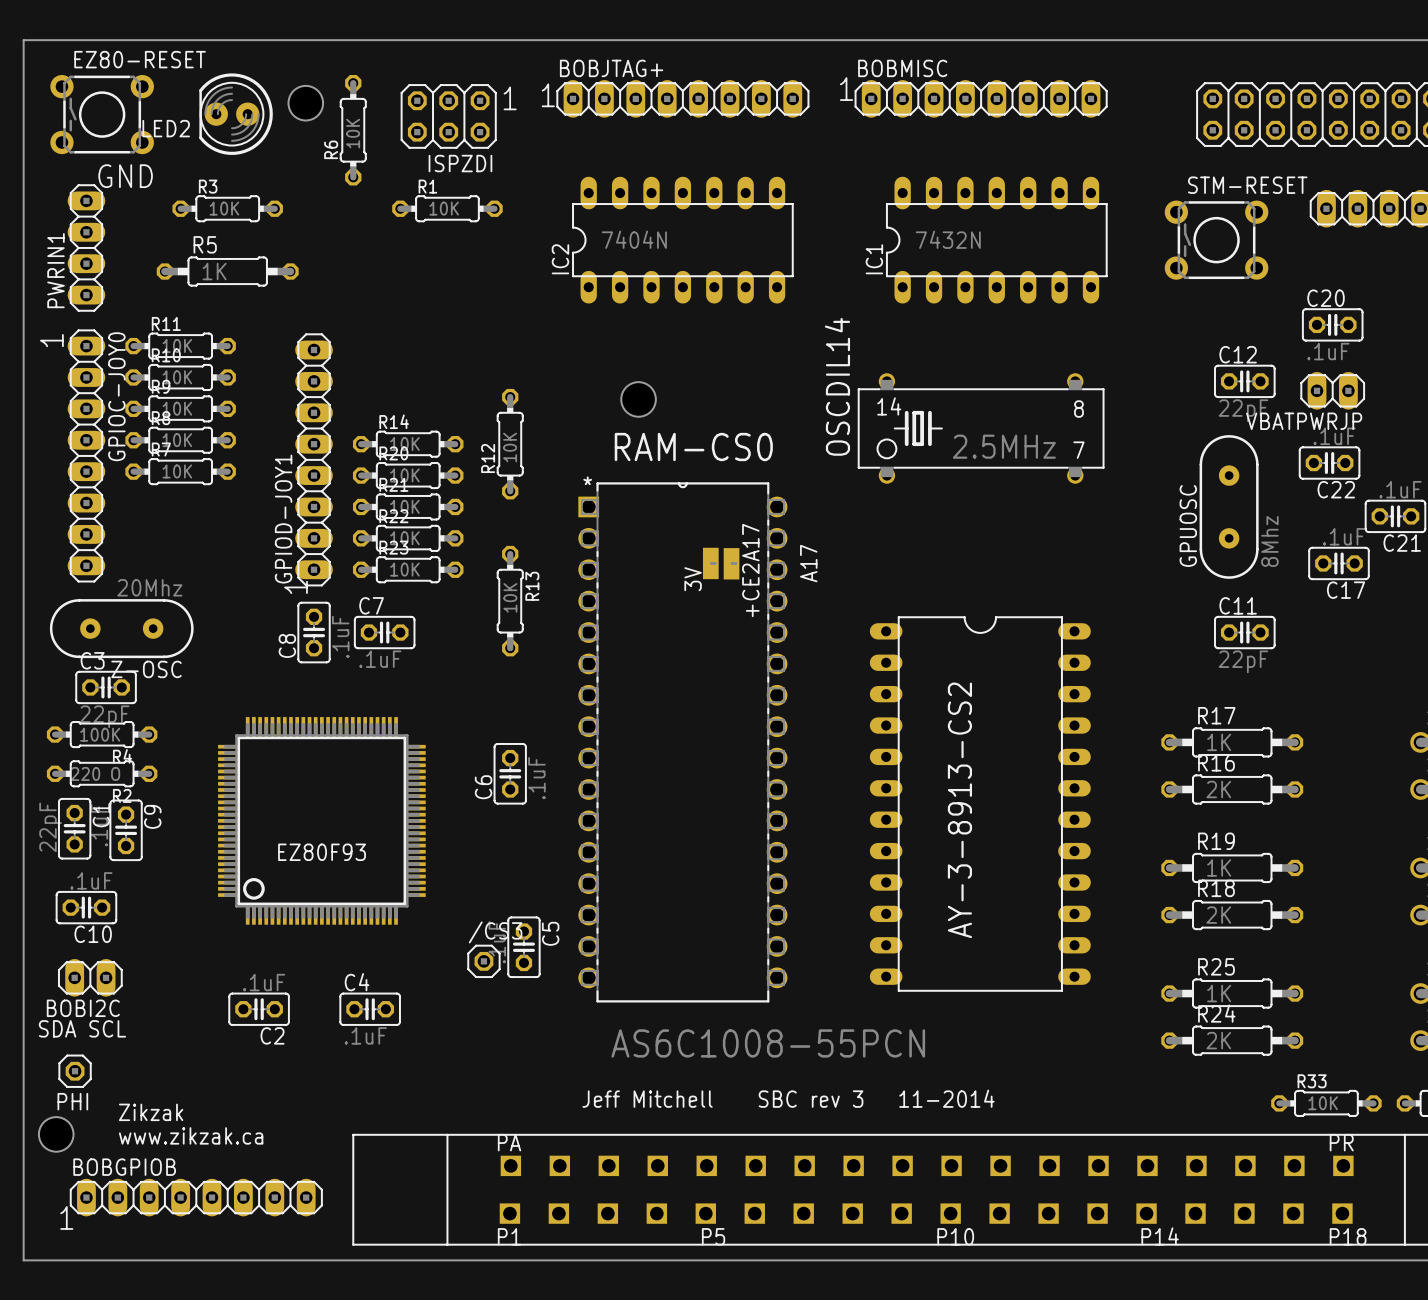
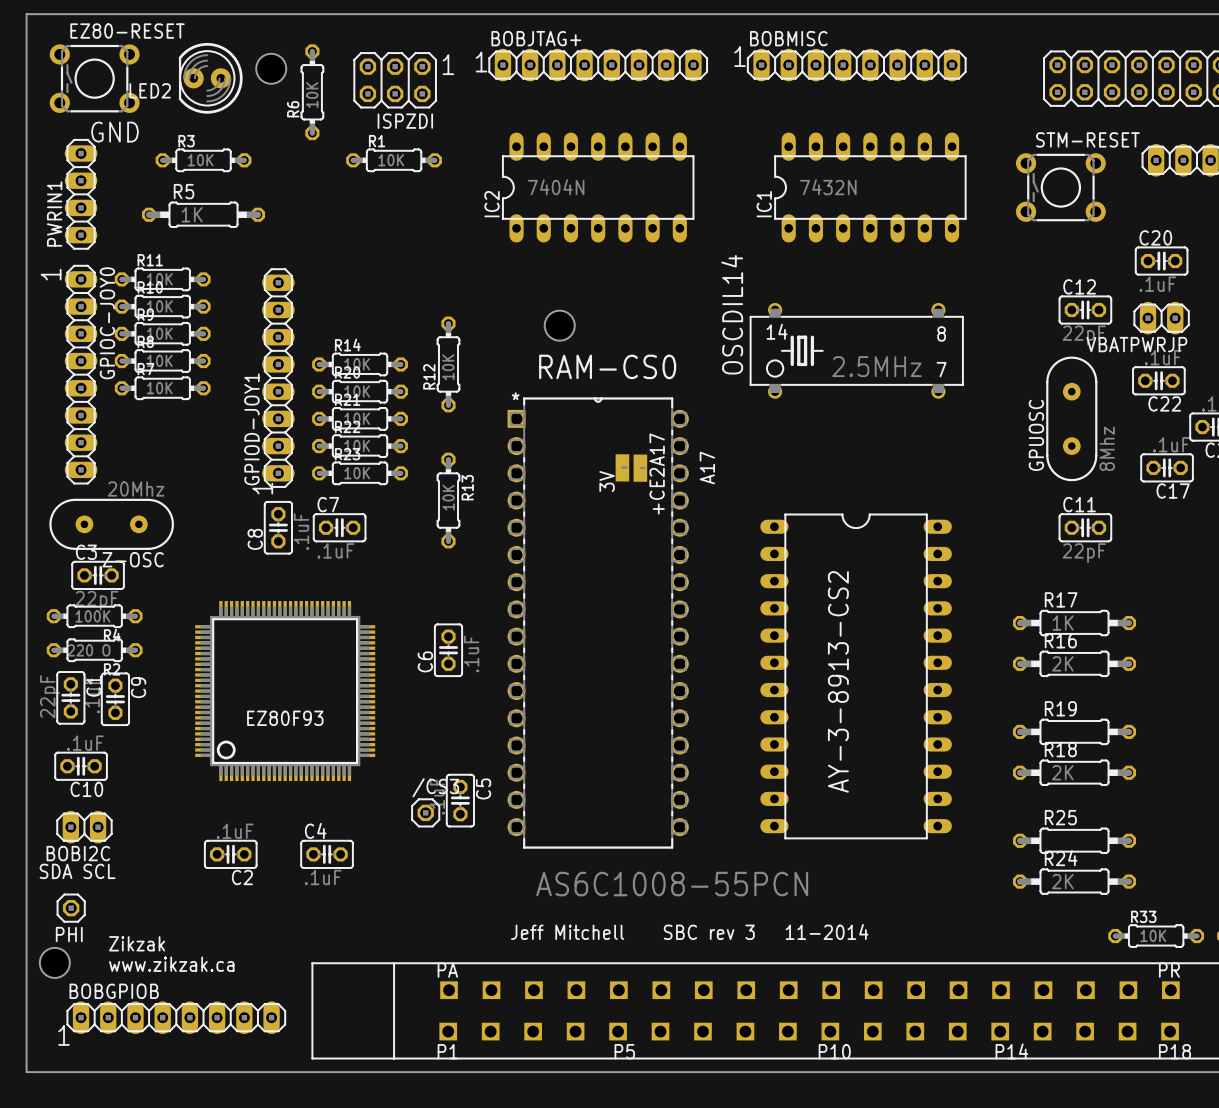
R19 value: 1K (1219, 867) -> none
R25 value: 1K (1219, 993) -> none

